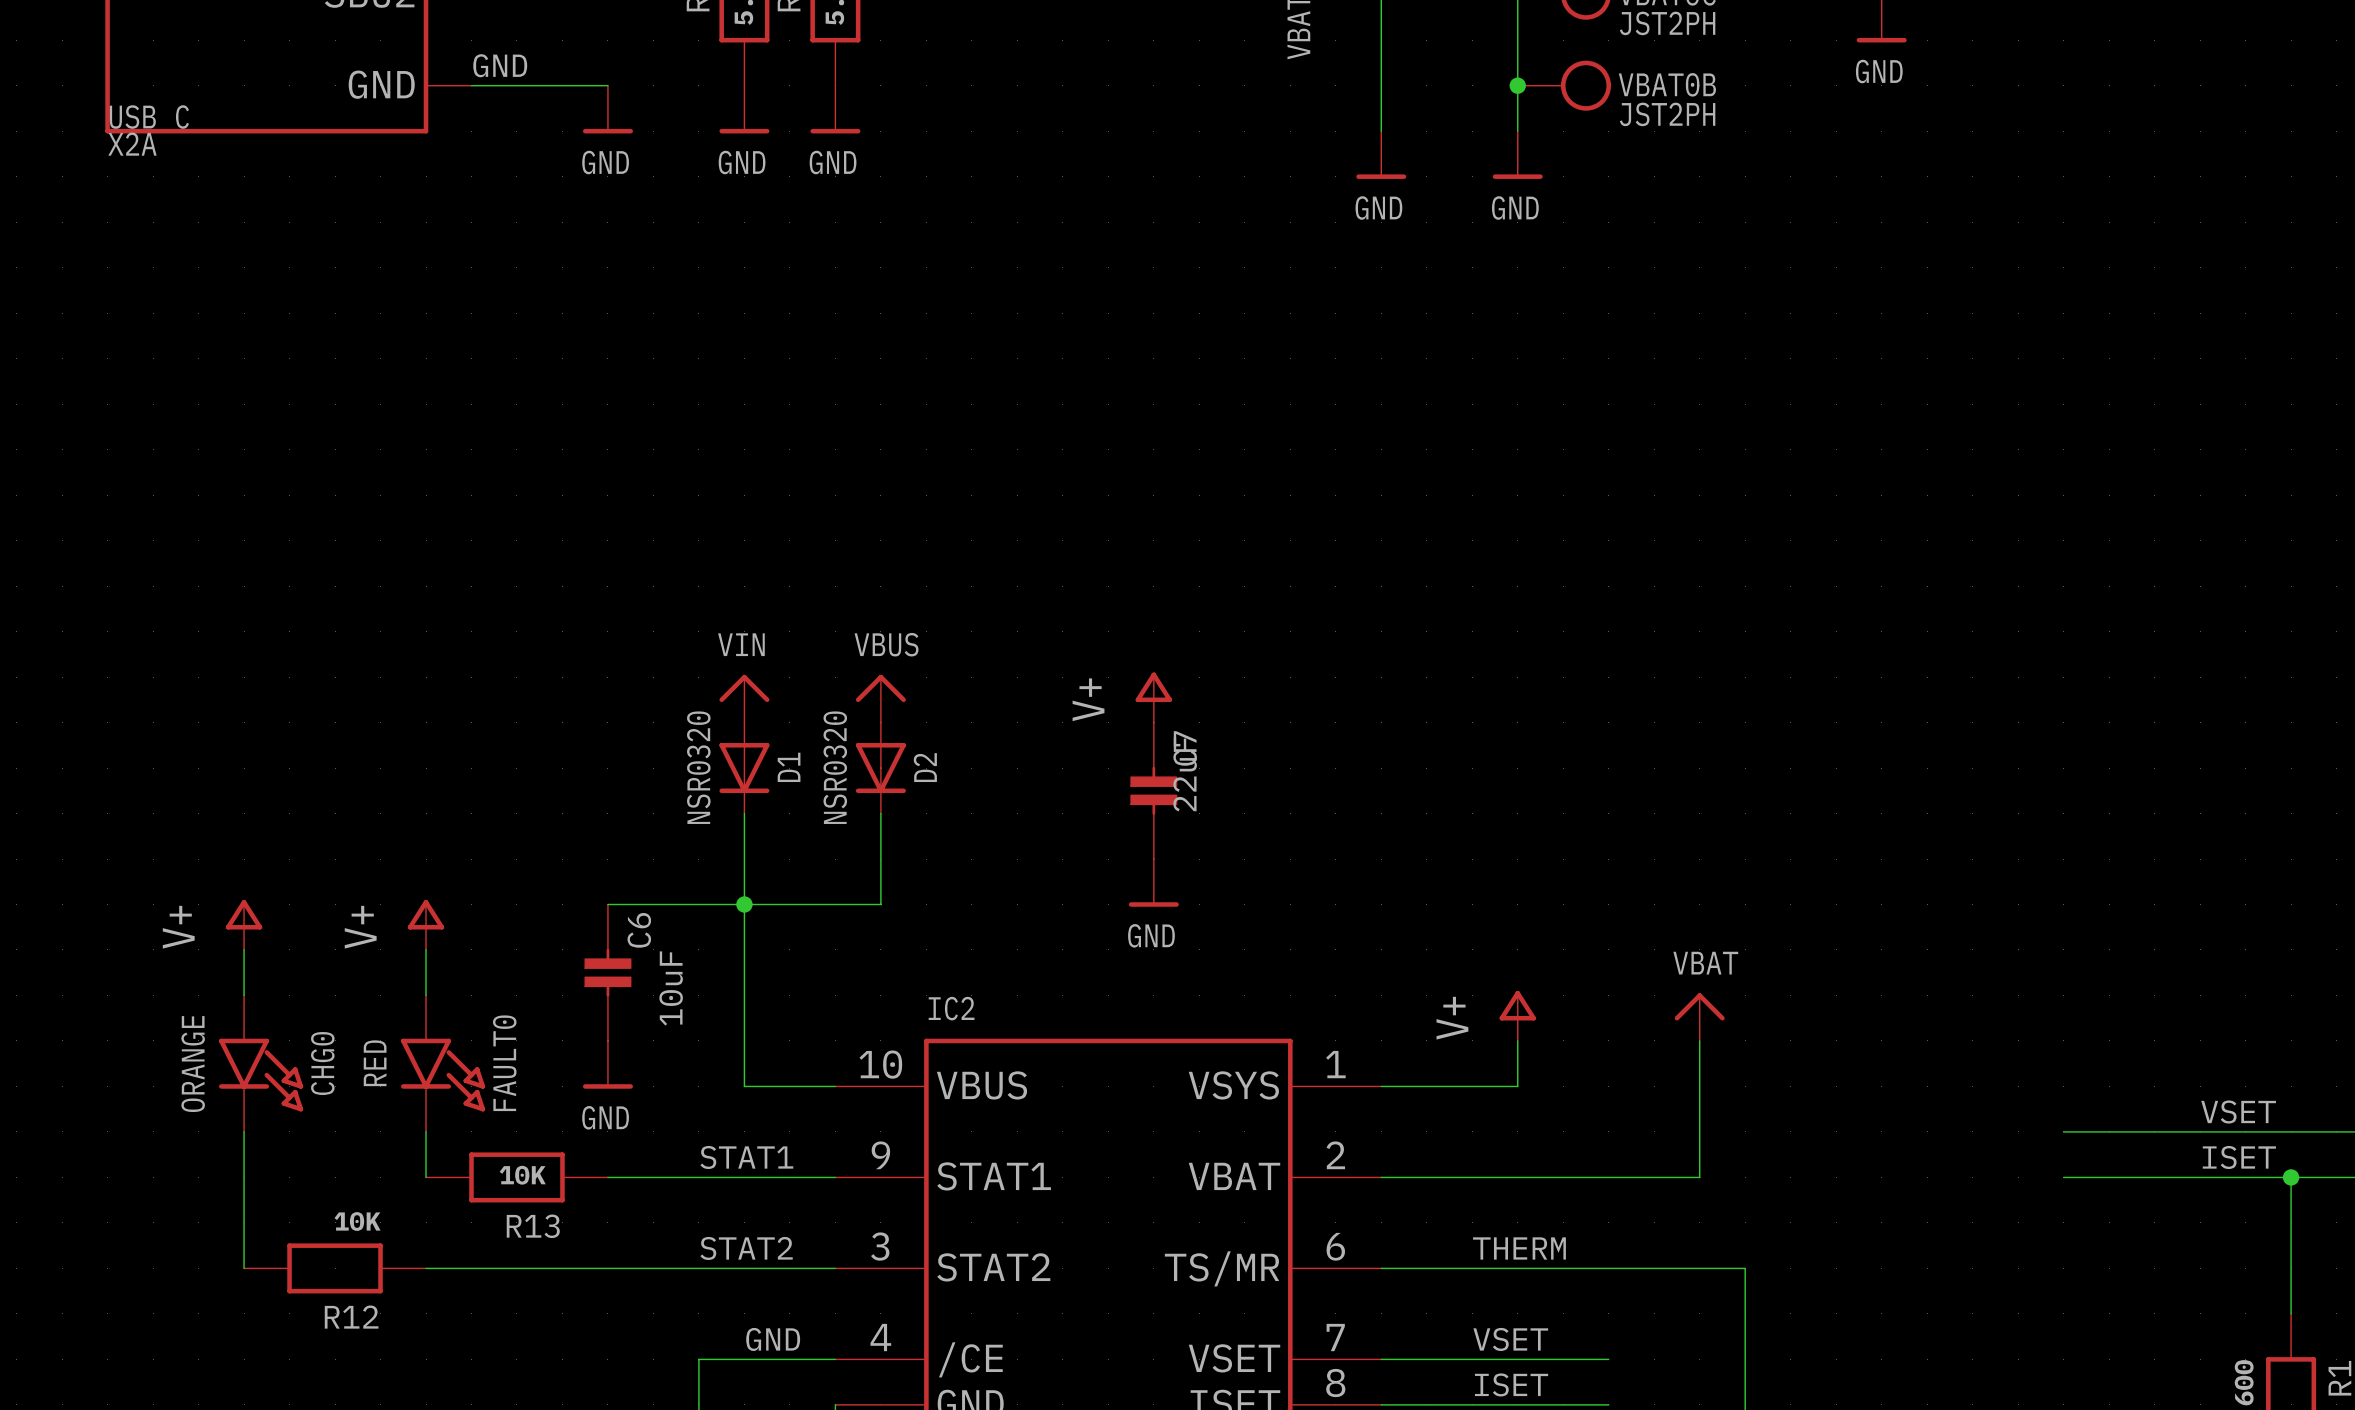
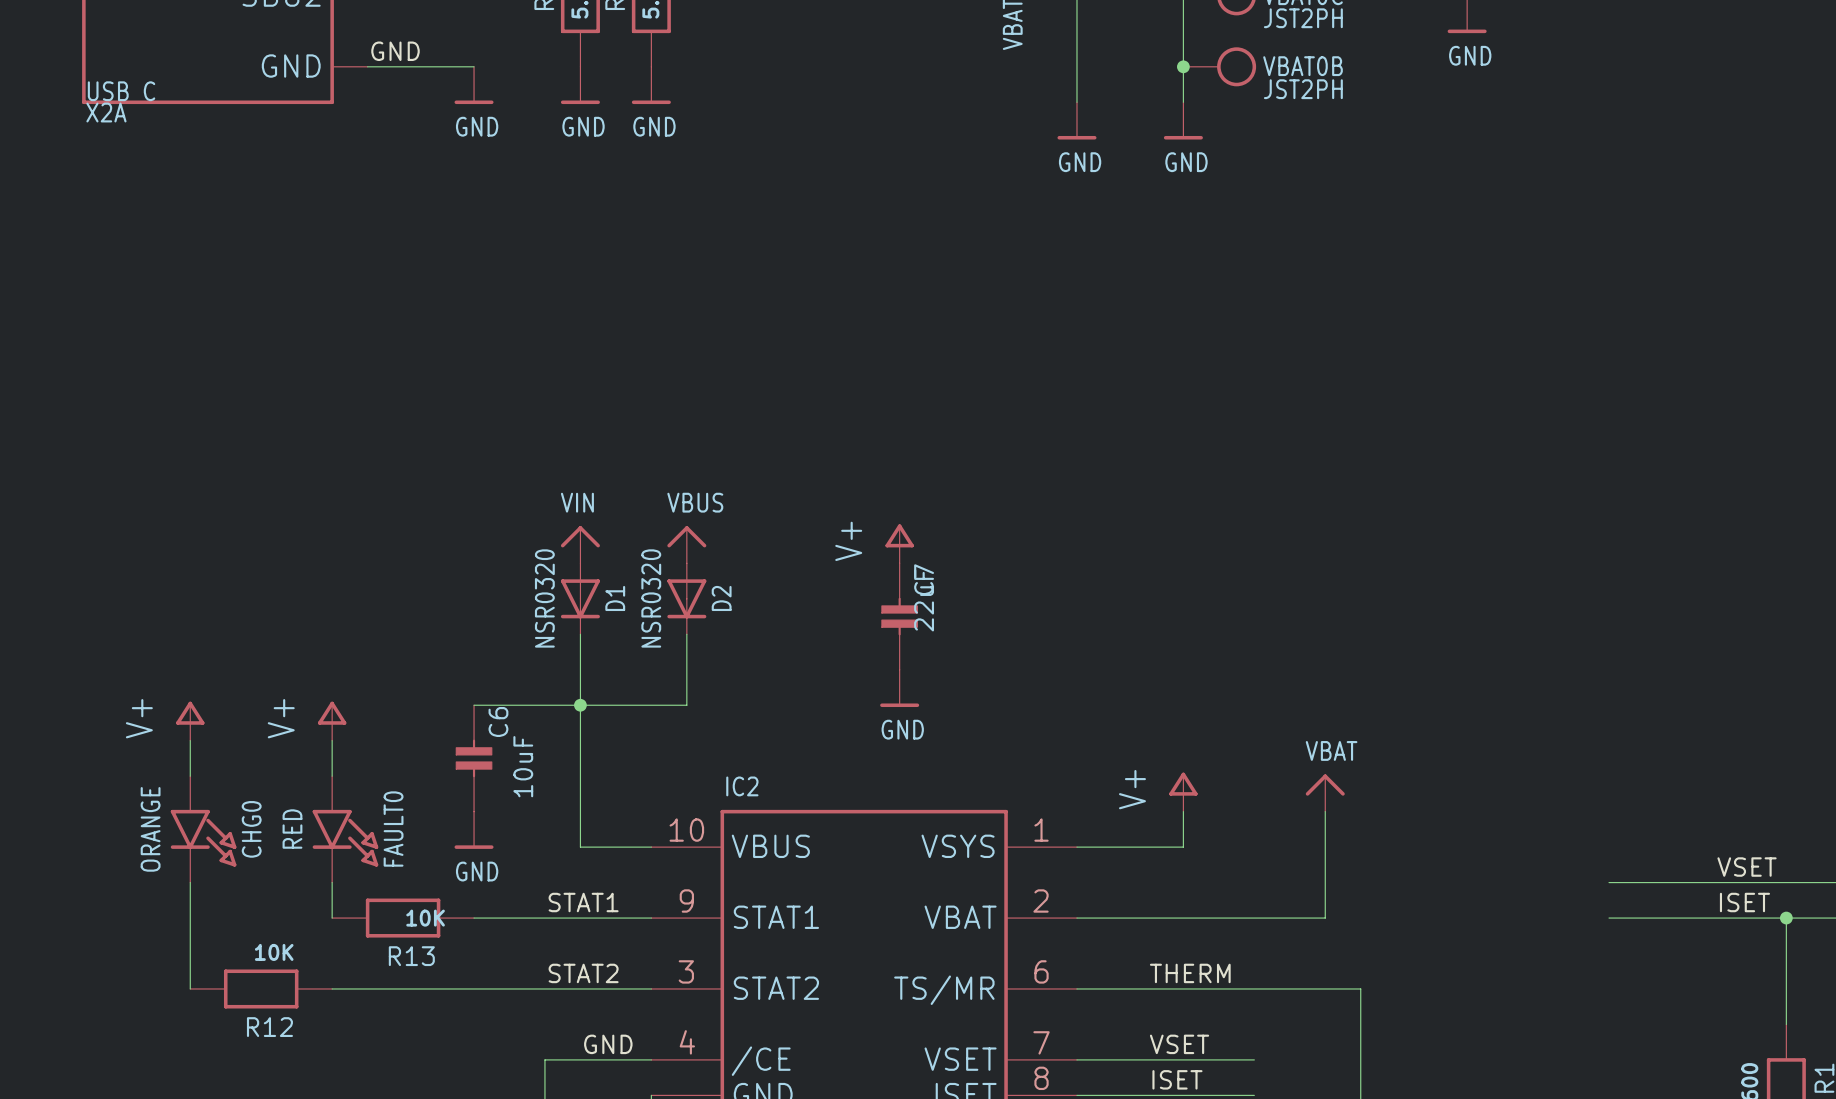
R13 value position: 10K (522, 1175) -> 10K (425, 918)

